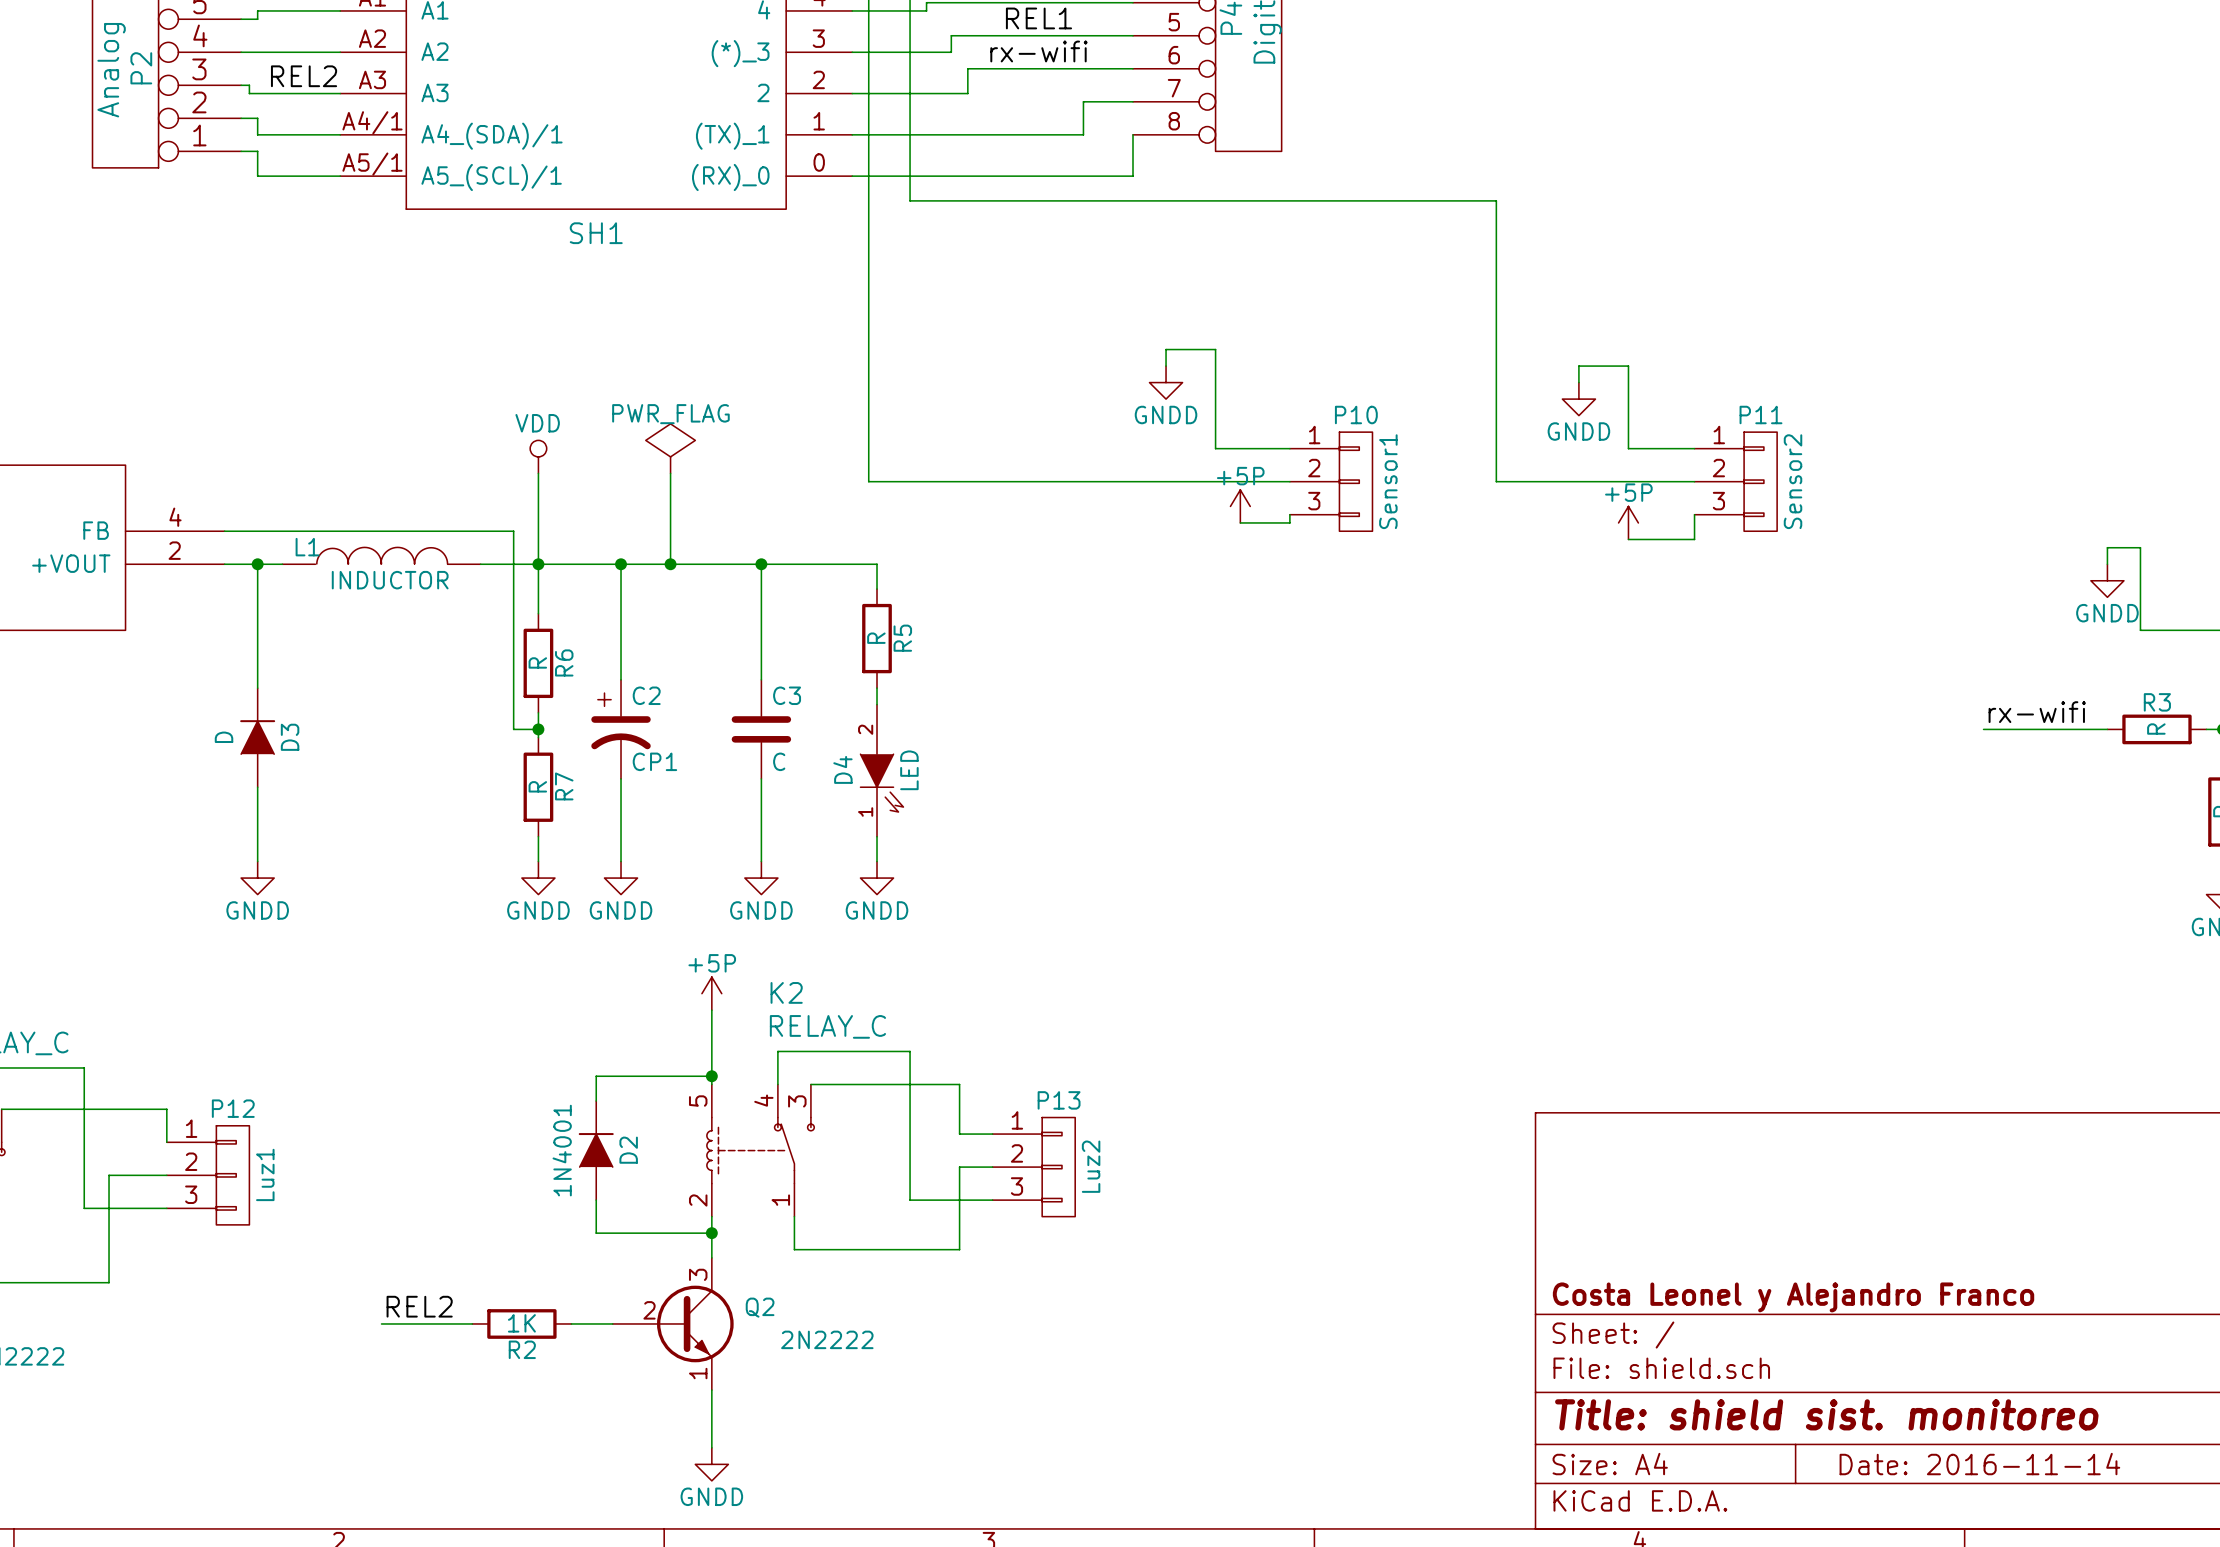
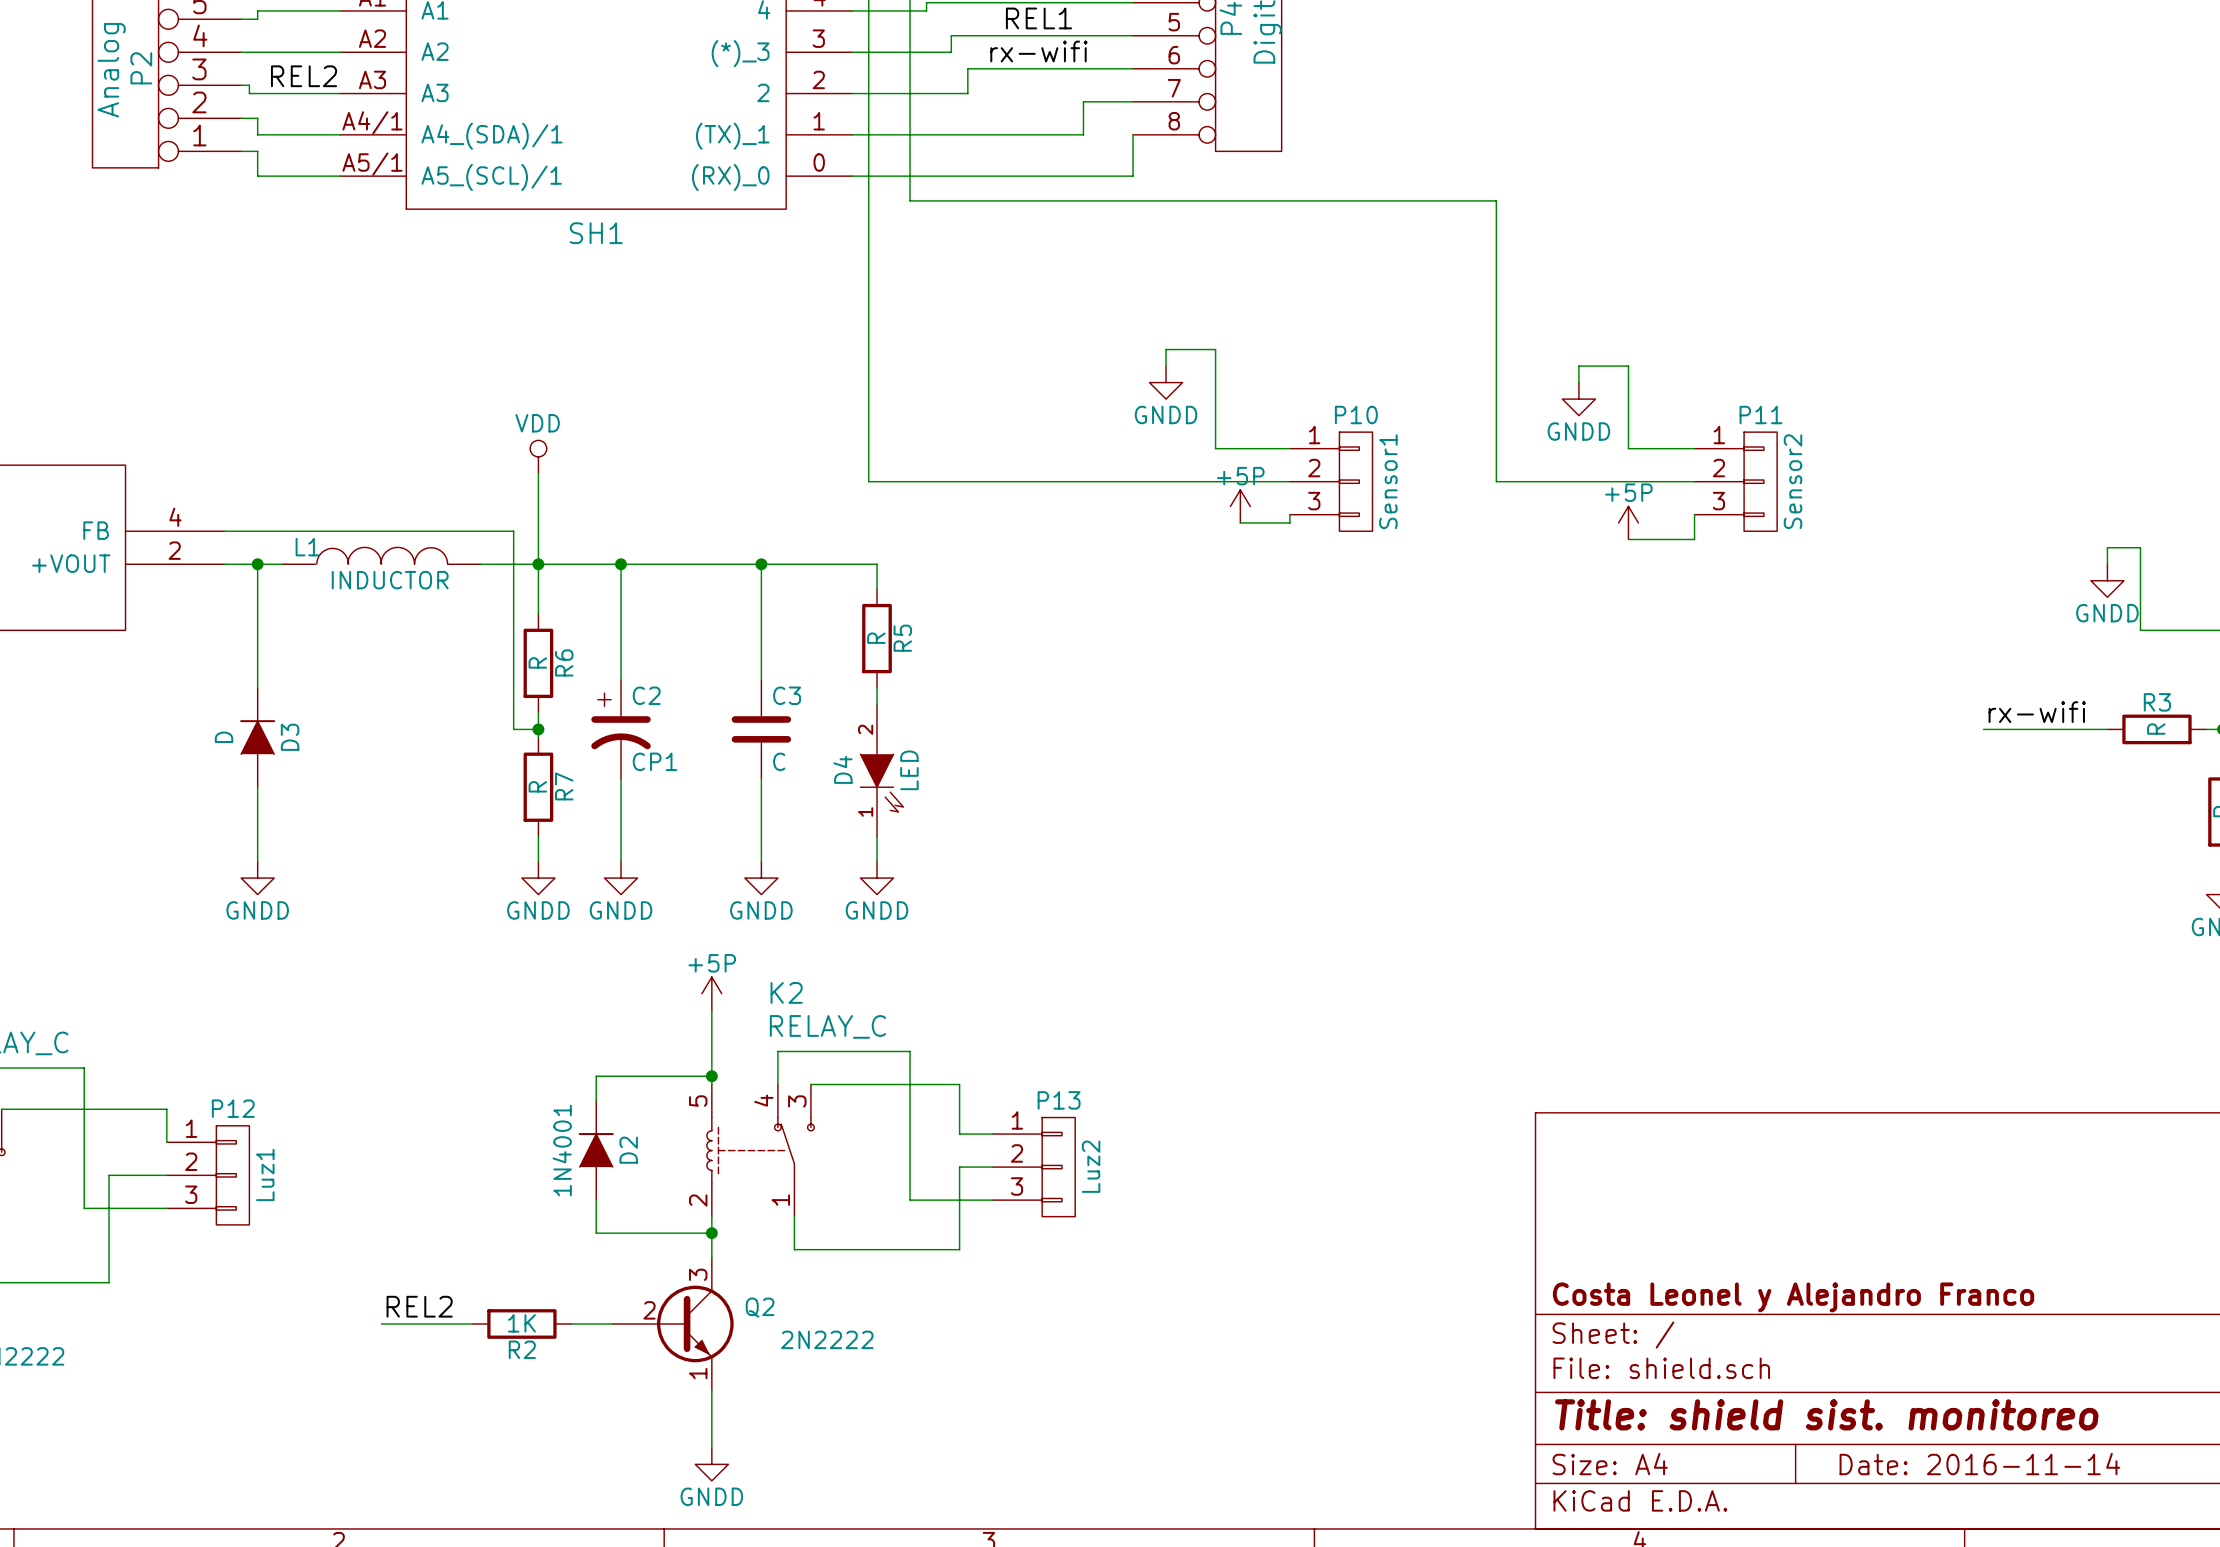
power symbol: PWR_FLAG (670, 448) -> none
wire: (670, 473) (670, 564) -> none
junction: (670, 564) -> none

